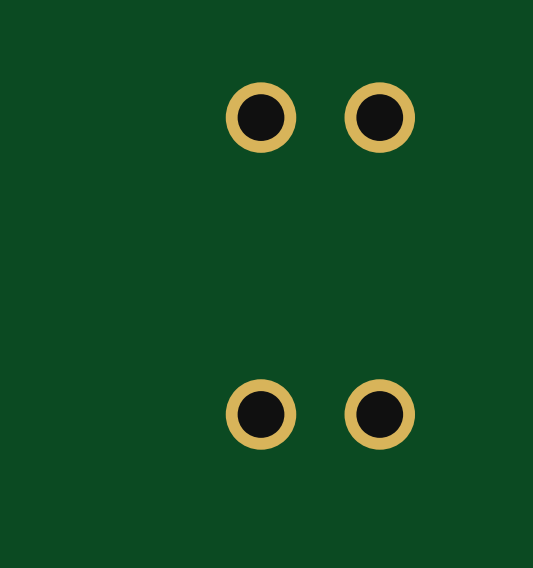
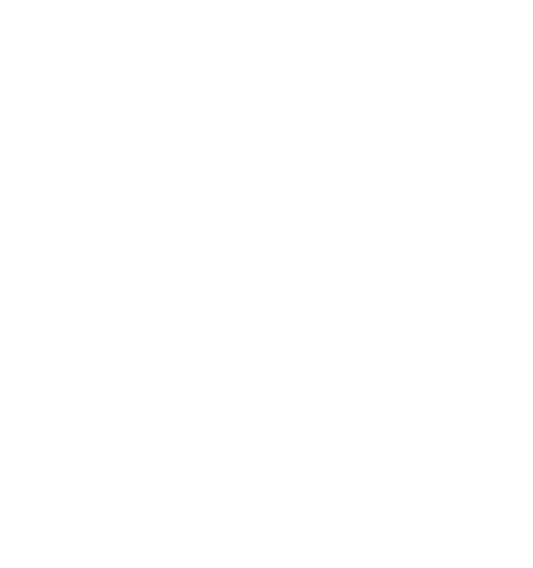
part: (320, 117) -> none
part: (320, 414) -> none

